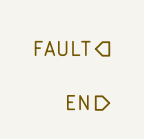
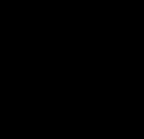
hierarchical label: FAULT (62, 48) -> none
hierarchical label: EN (77, 102) -> none

